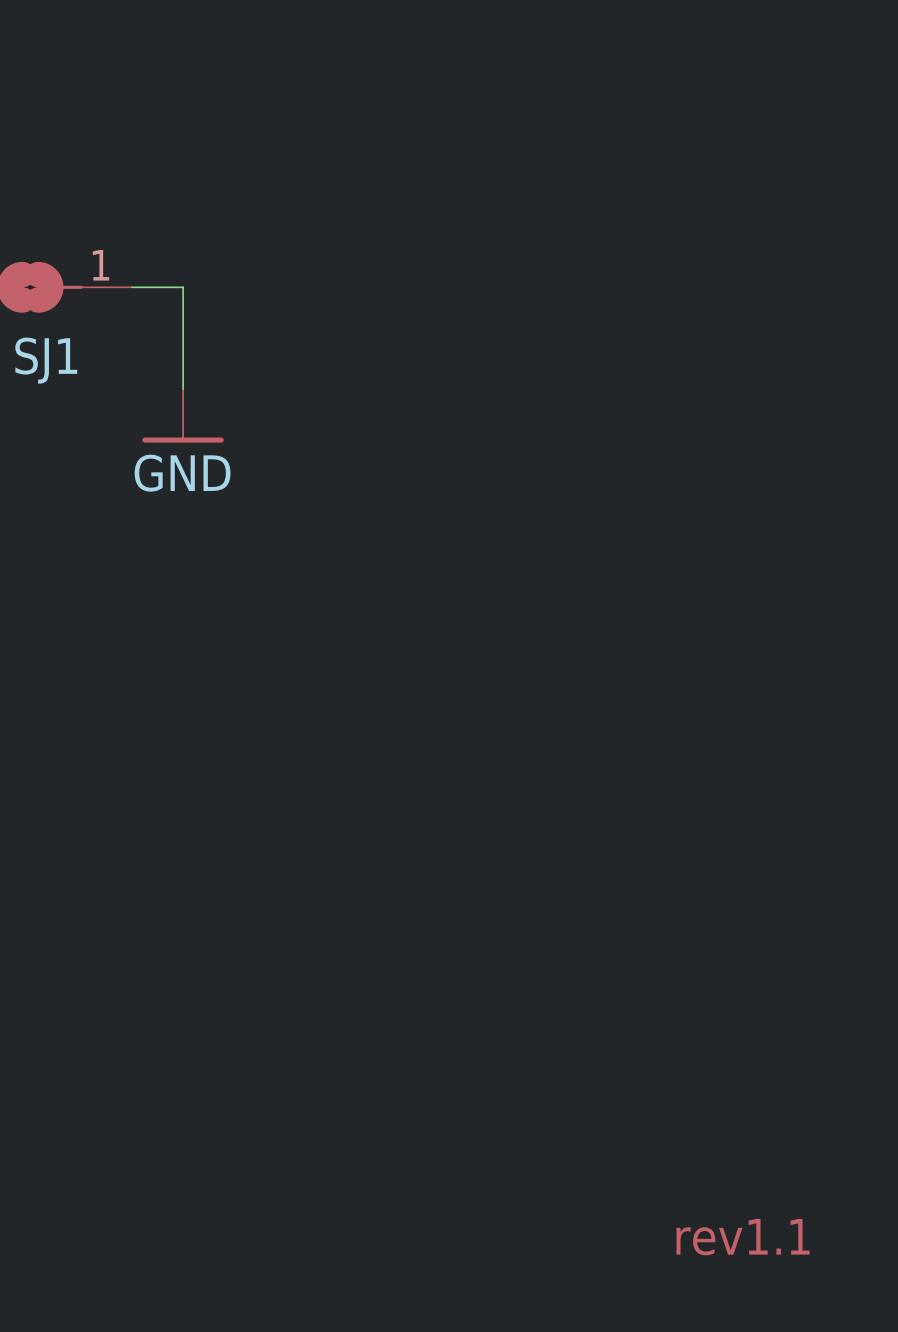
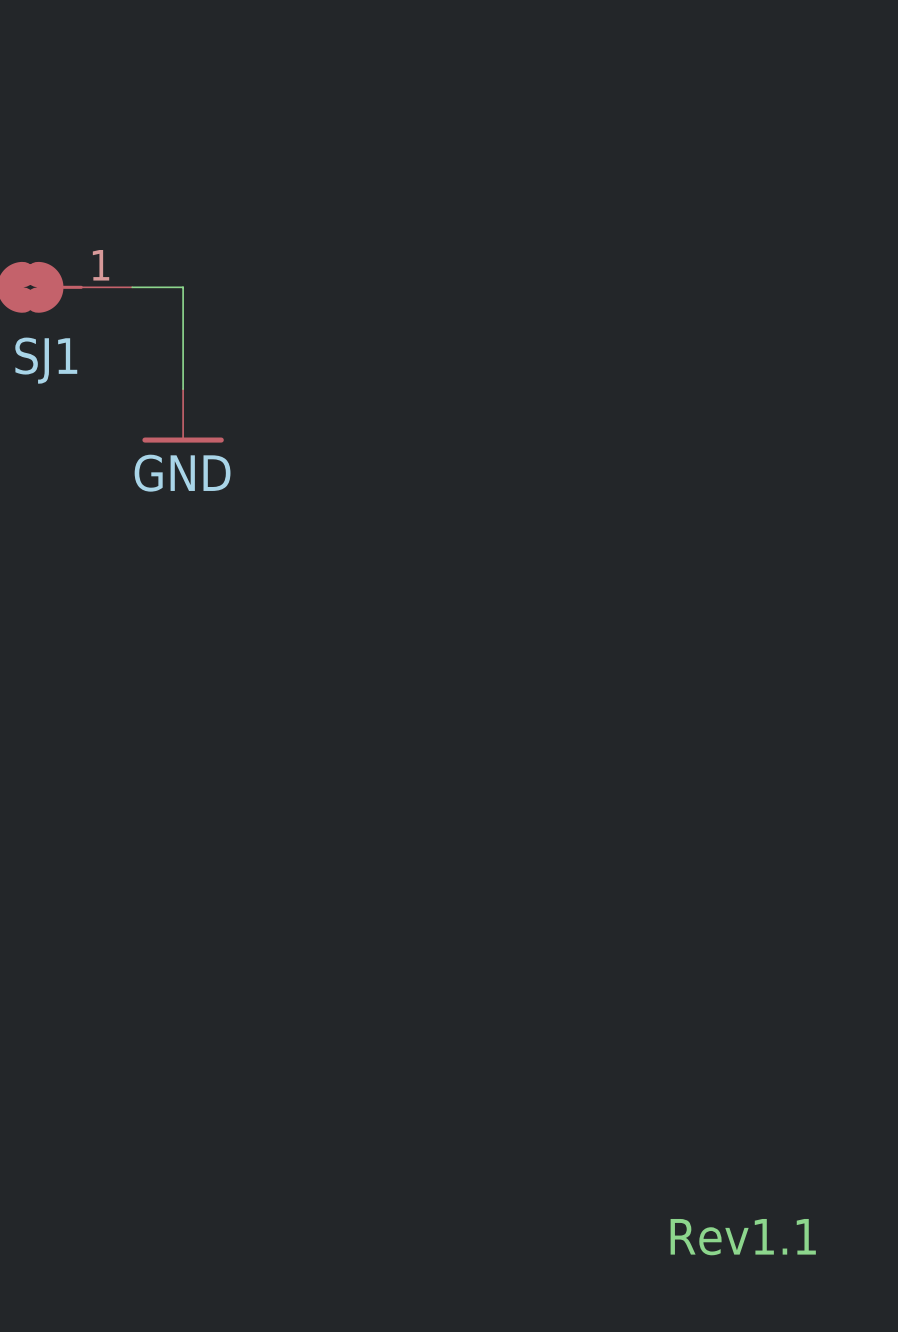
text: rev1.1 (743, 1237) -> Rev1.1 (743, 1237)

